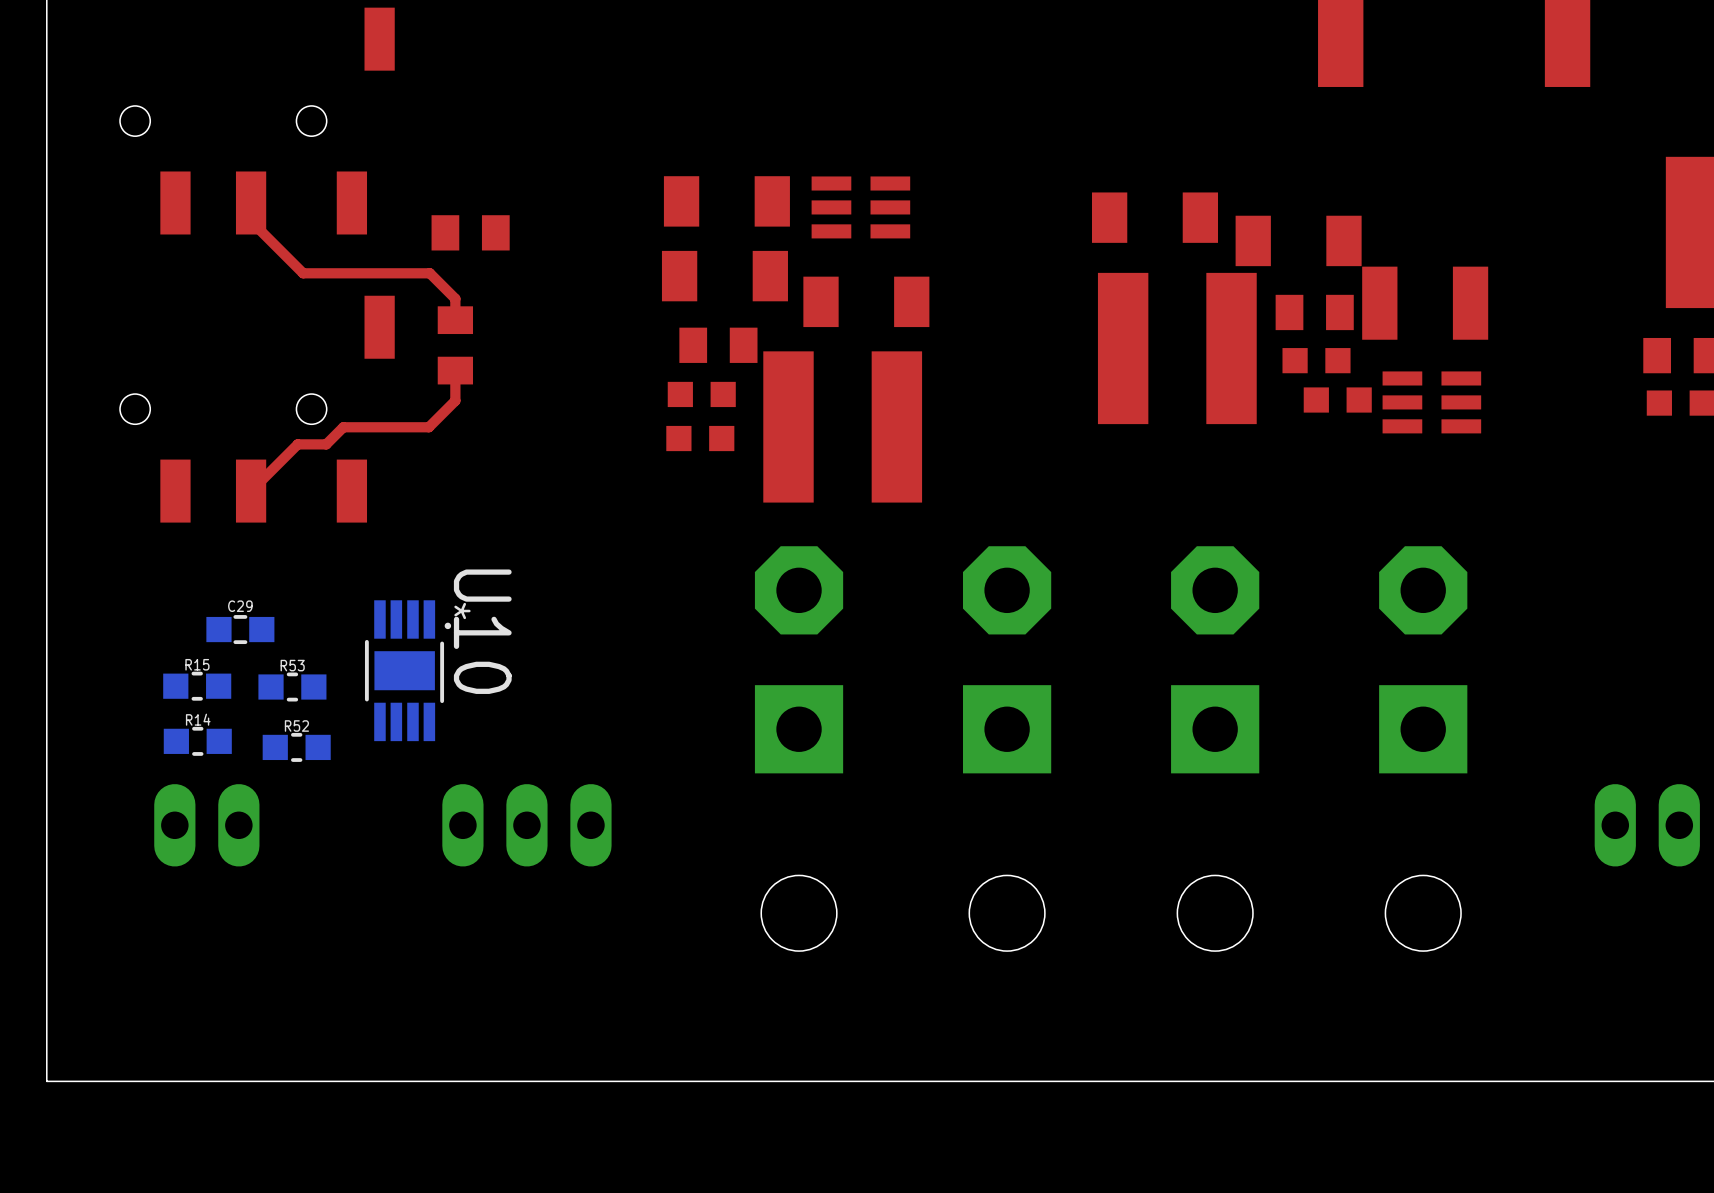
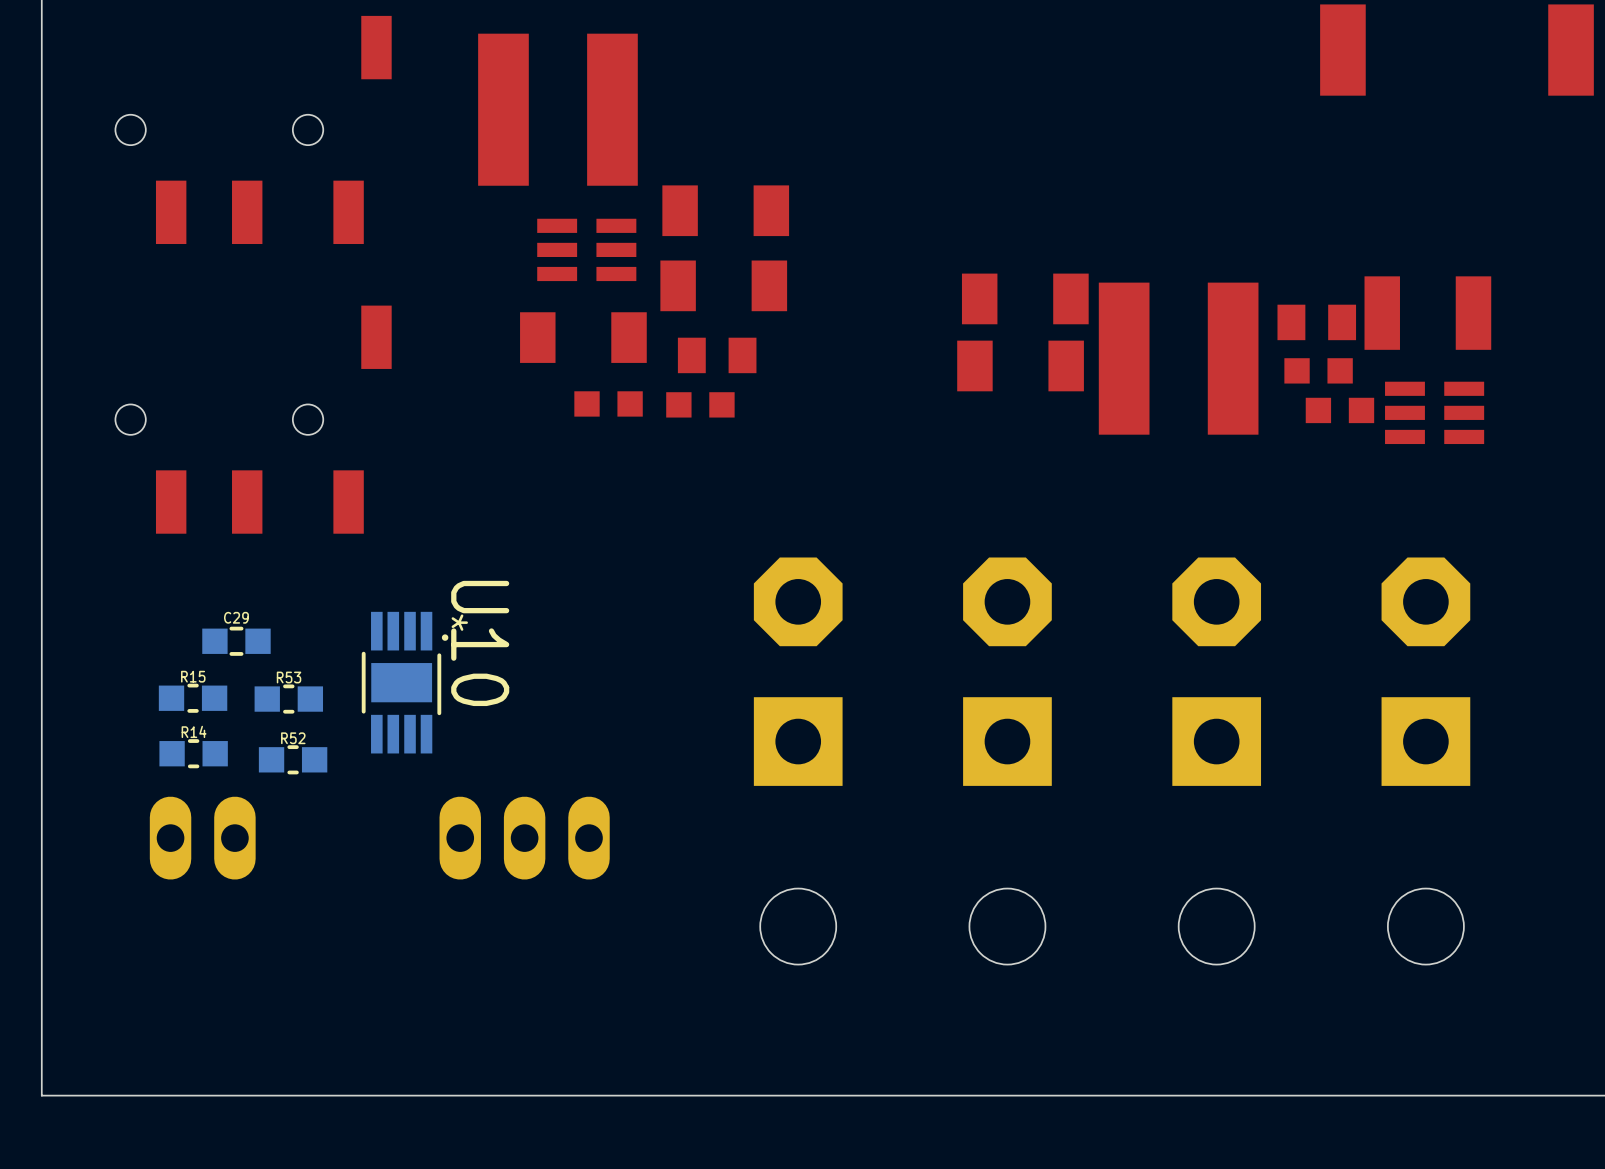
top track: (251, 202) (256, 208) (256, 227) (303, 273) (429, 273) (455, 298) (455, 320) -> none
part position: (860, 207) -> (586, 249)
part: (1154, 217) -> none
part: (470, 232) -> none
part: (1298, 240) -> none
part: none -> (1025, 298)
part: (866, 301) -> none
part: none -> (583, 337)
part: (455, 345) -> none
part: none -> (1020, 365)
top track: (455, 370) (455, 400) (428, 427) (343, 427) (326, 444) (297, 444) (251, 491) -> none
part position: (842, 426) -> (557, 109)
part position: (700, 438) -> (608, 403)

